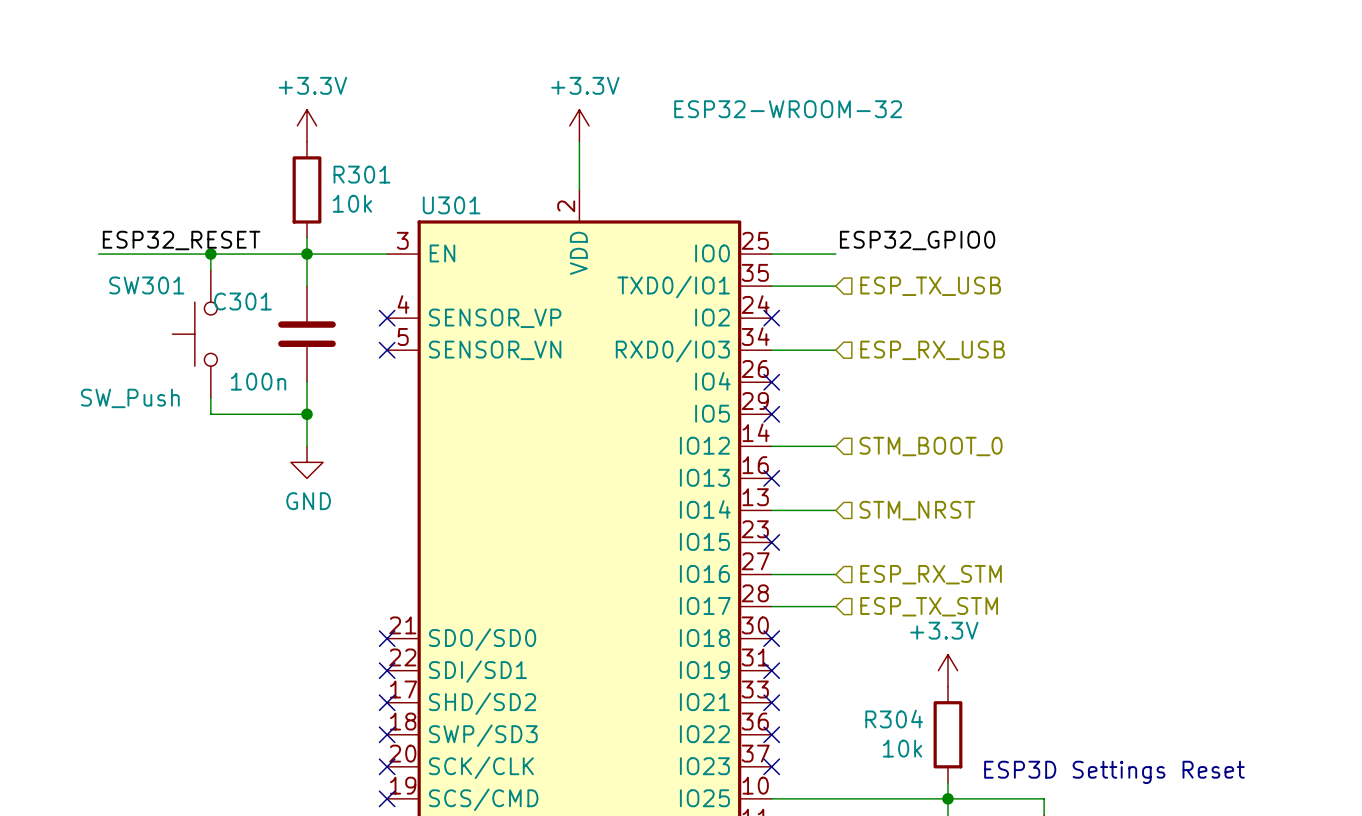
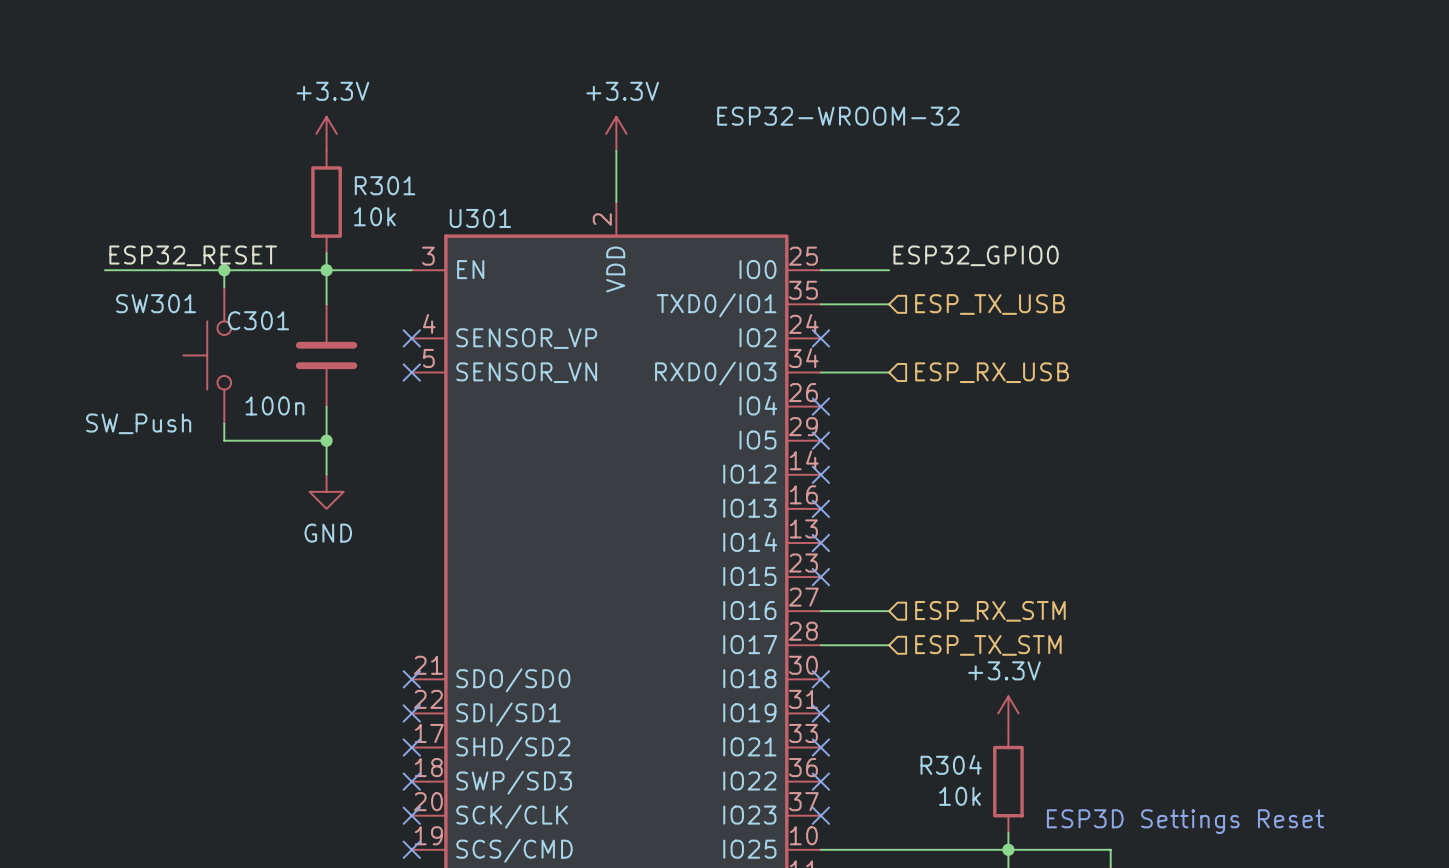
wire: (771, 446) (835, 446) -> none
no-connect mark: none -> (820, 474)
hierarchical label: STM_BOOT_0 (931, 446) -> none
wire: (771, 510) (835, 510) -> none
no-connect mark: none -> (820, 542)
hierarchical label: STM_NRST (917, 510) -> none

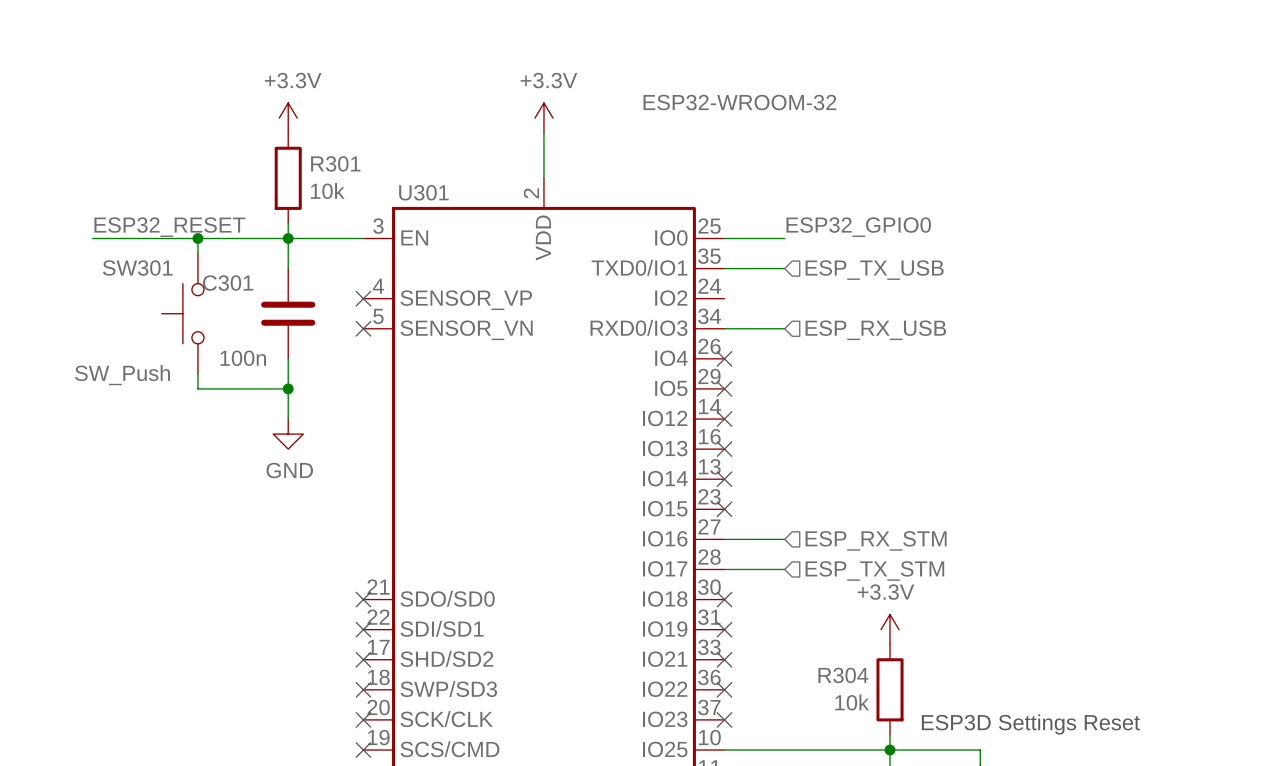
no-connect mark: (820, 338) -> none

